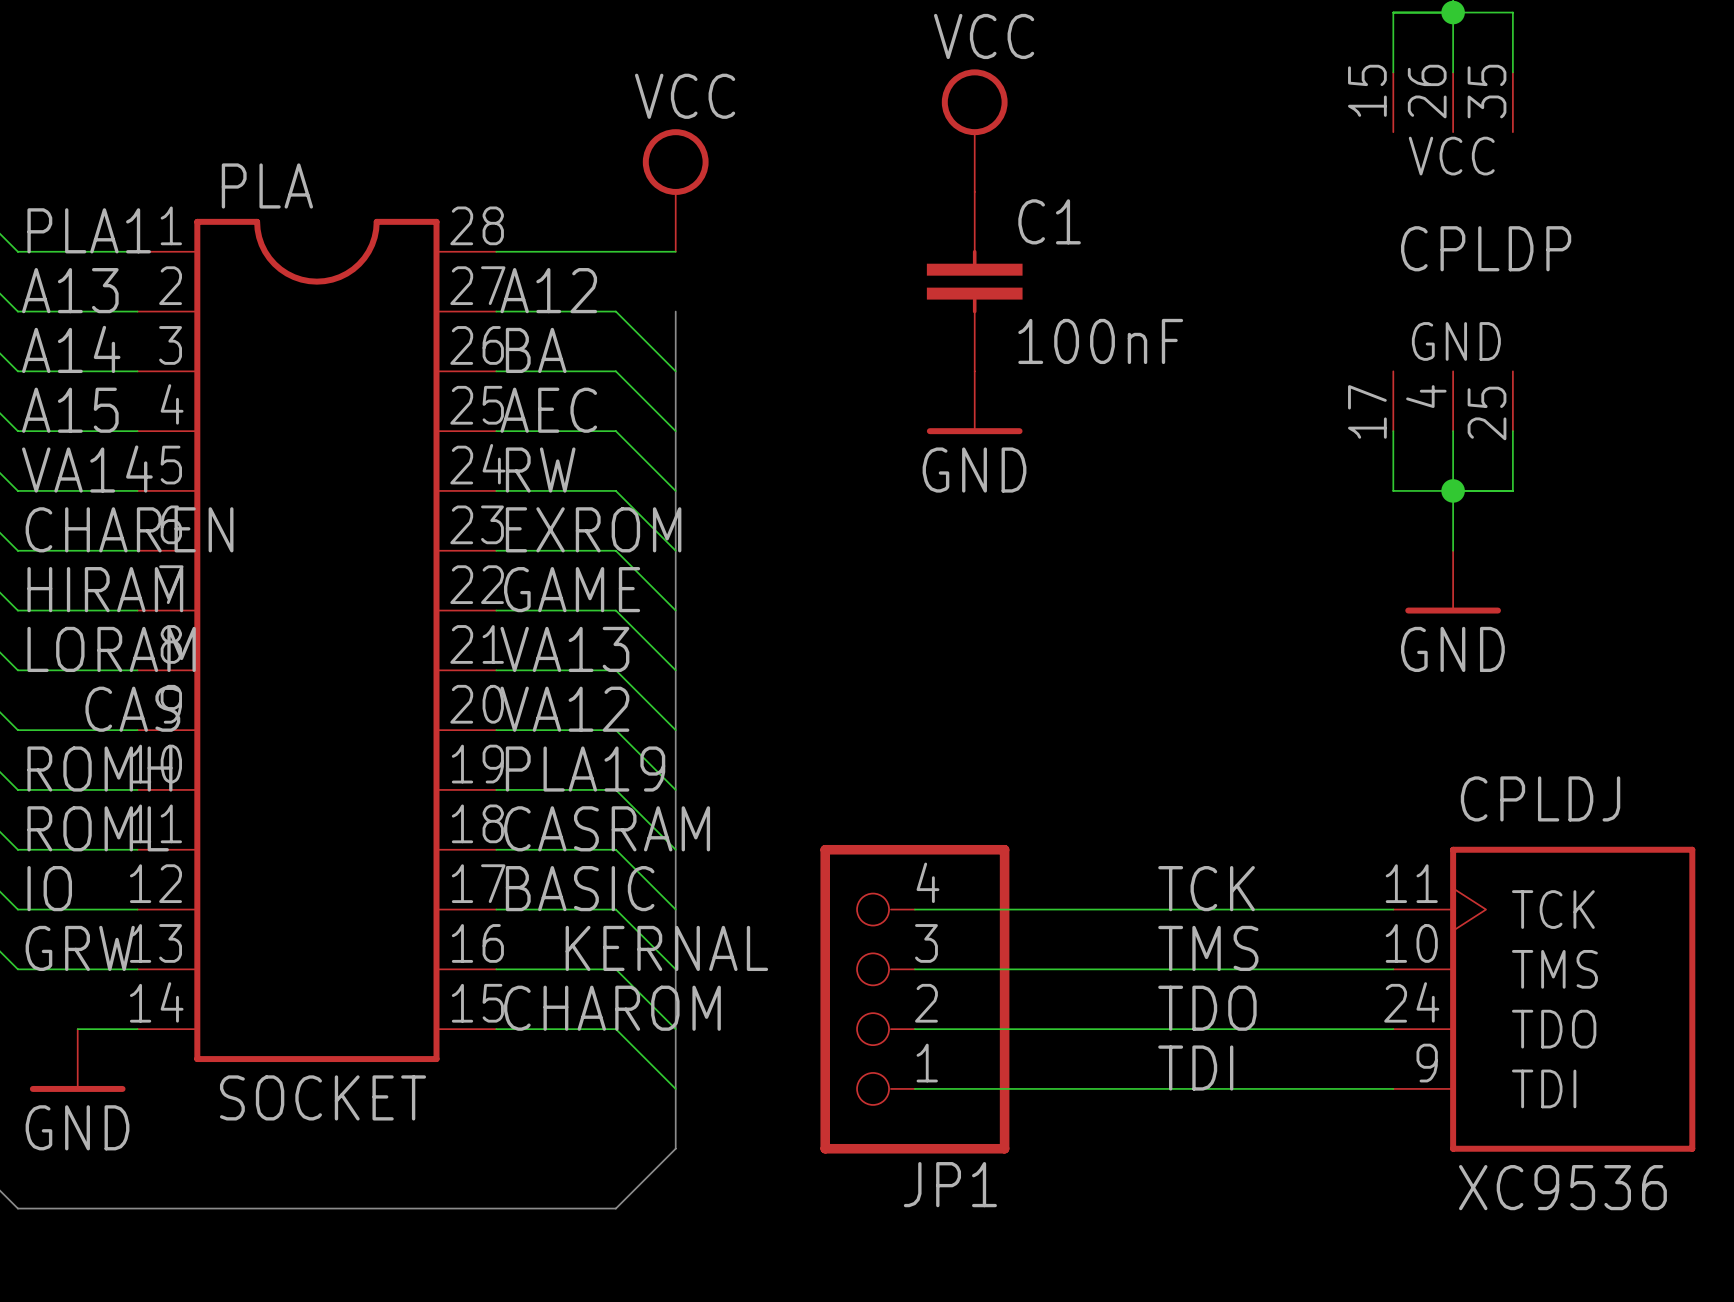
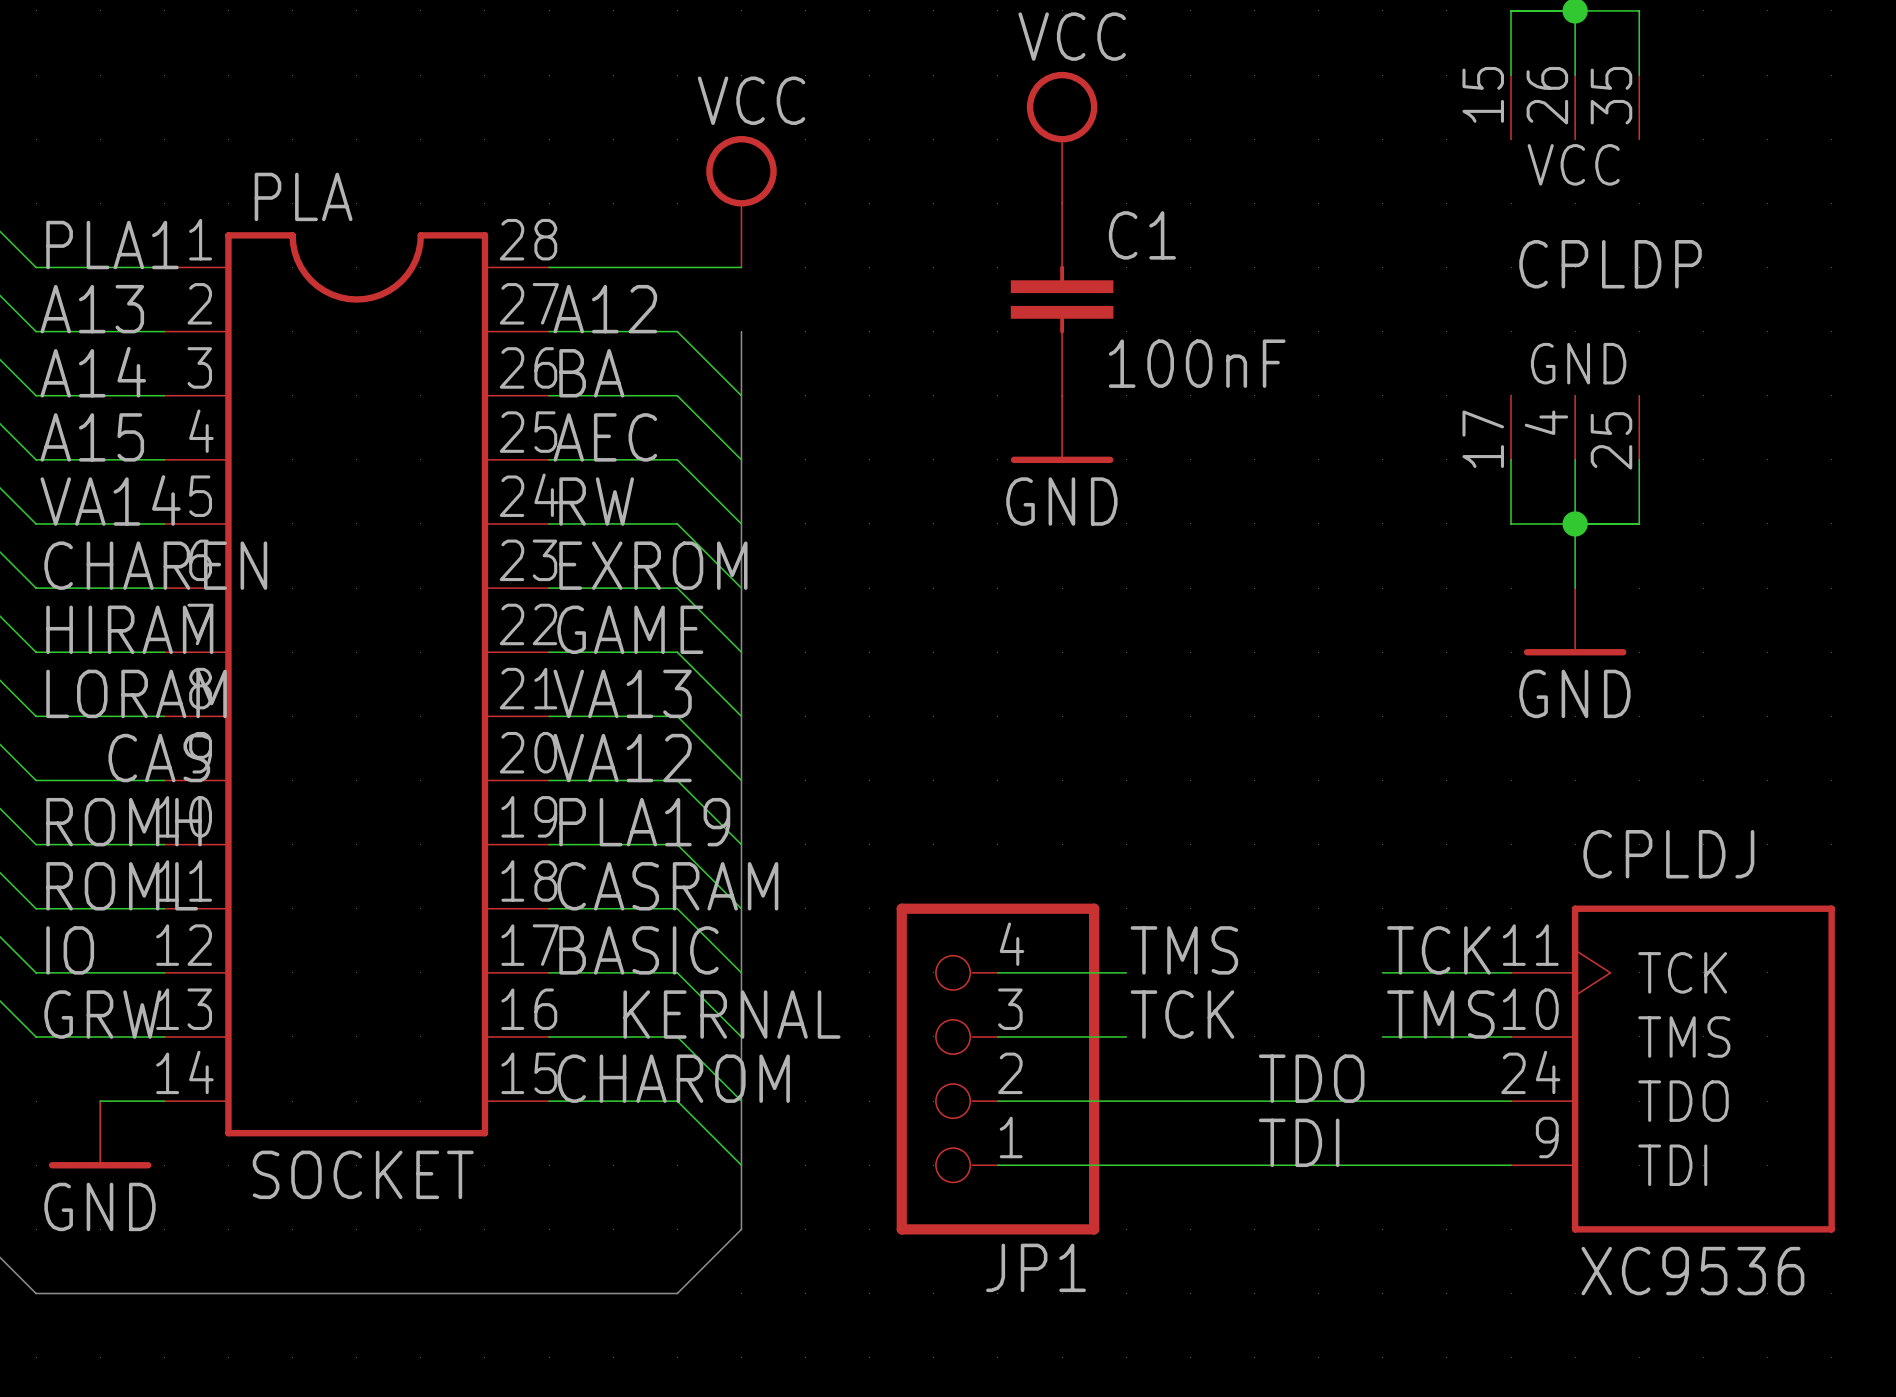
label: none -> TMS (1184, 950)
label: TCK (1206, 888) -> none
label: none -> TCK (1438, 950)
wire: (1034, 909) (1273, 909) -> none
label: none -> TCK (1182, 1014)
label: TMS (1208, 948) -> none
label: none -> TMS (1440, 1014)
wire: (1034, 969) (1273, 969) -> none

